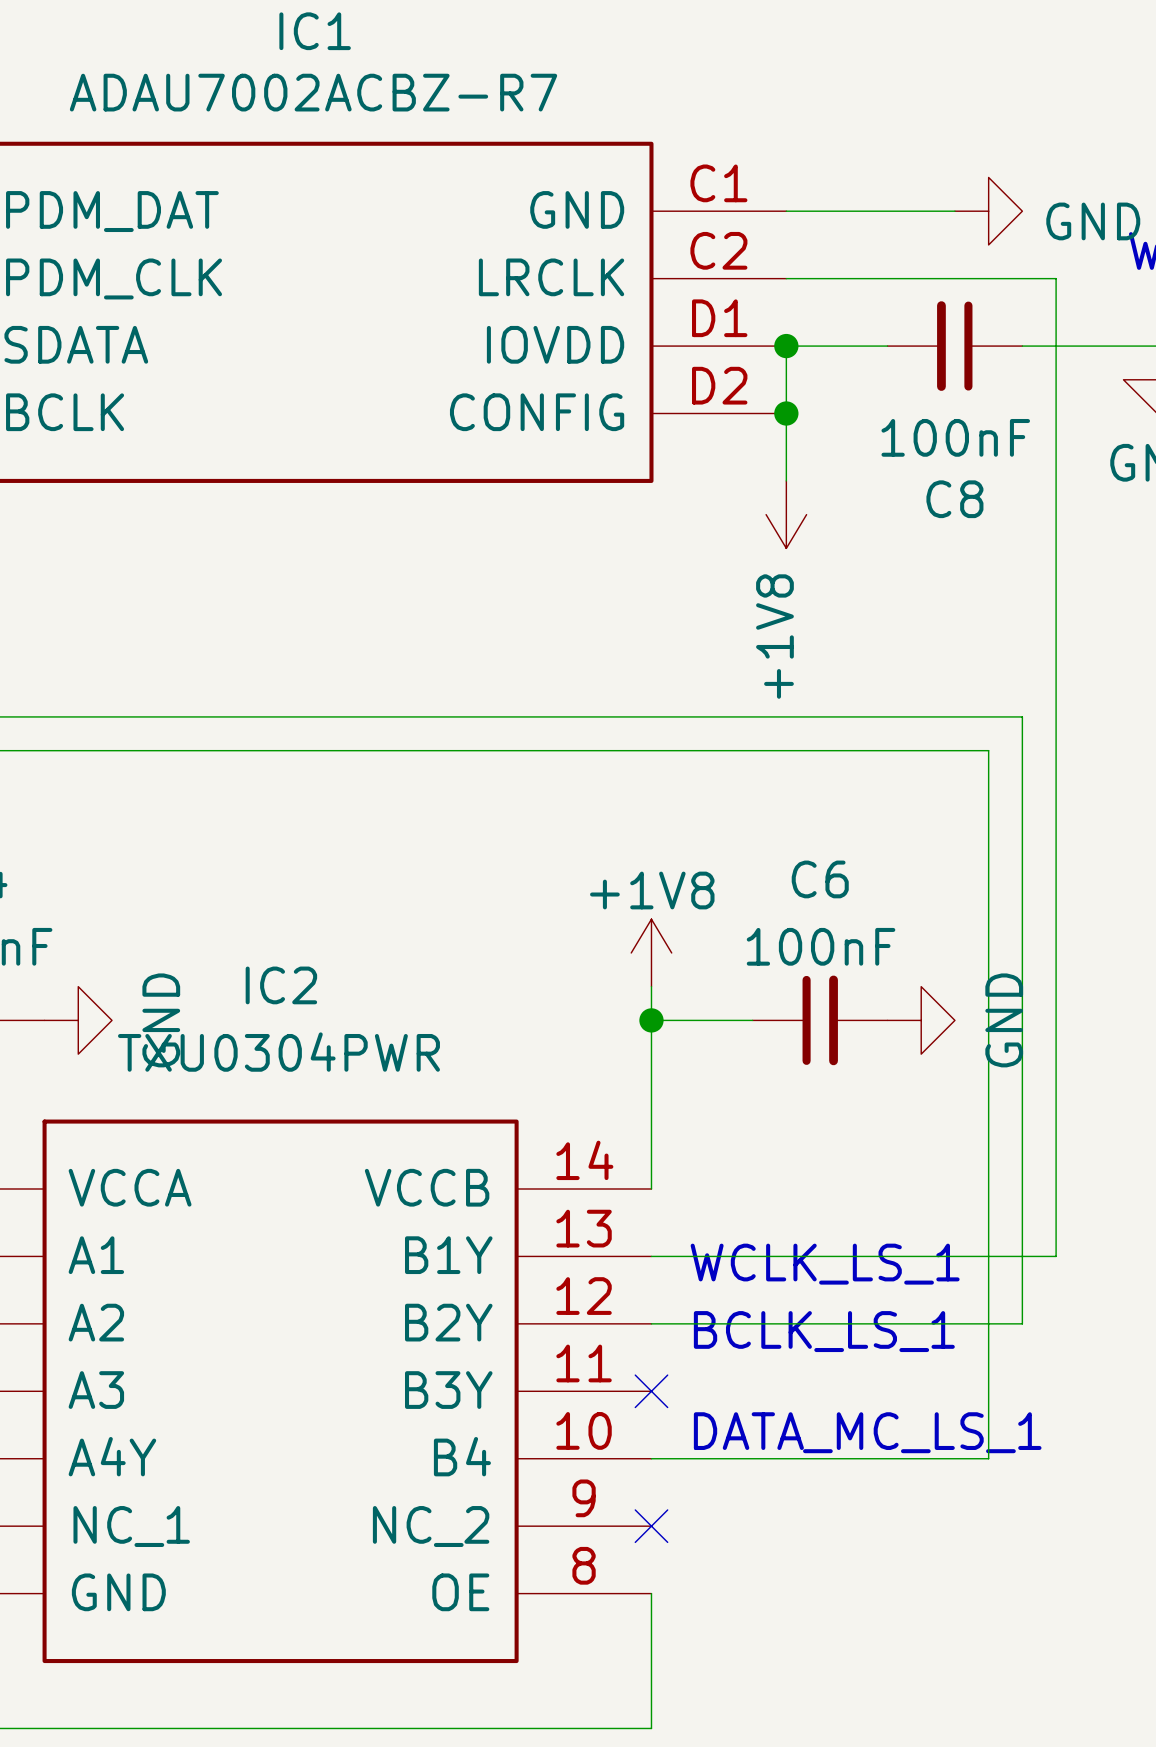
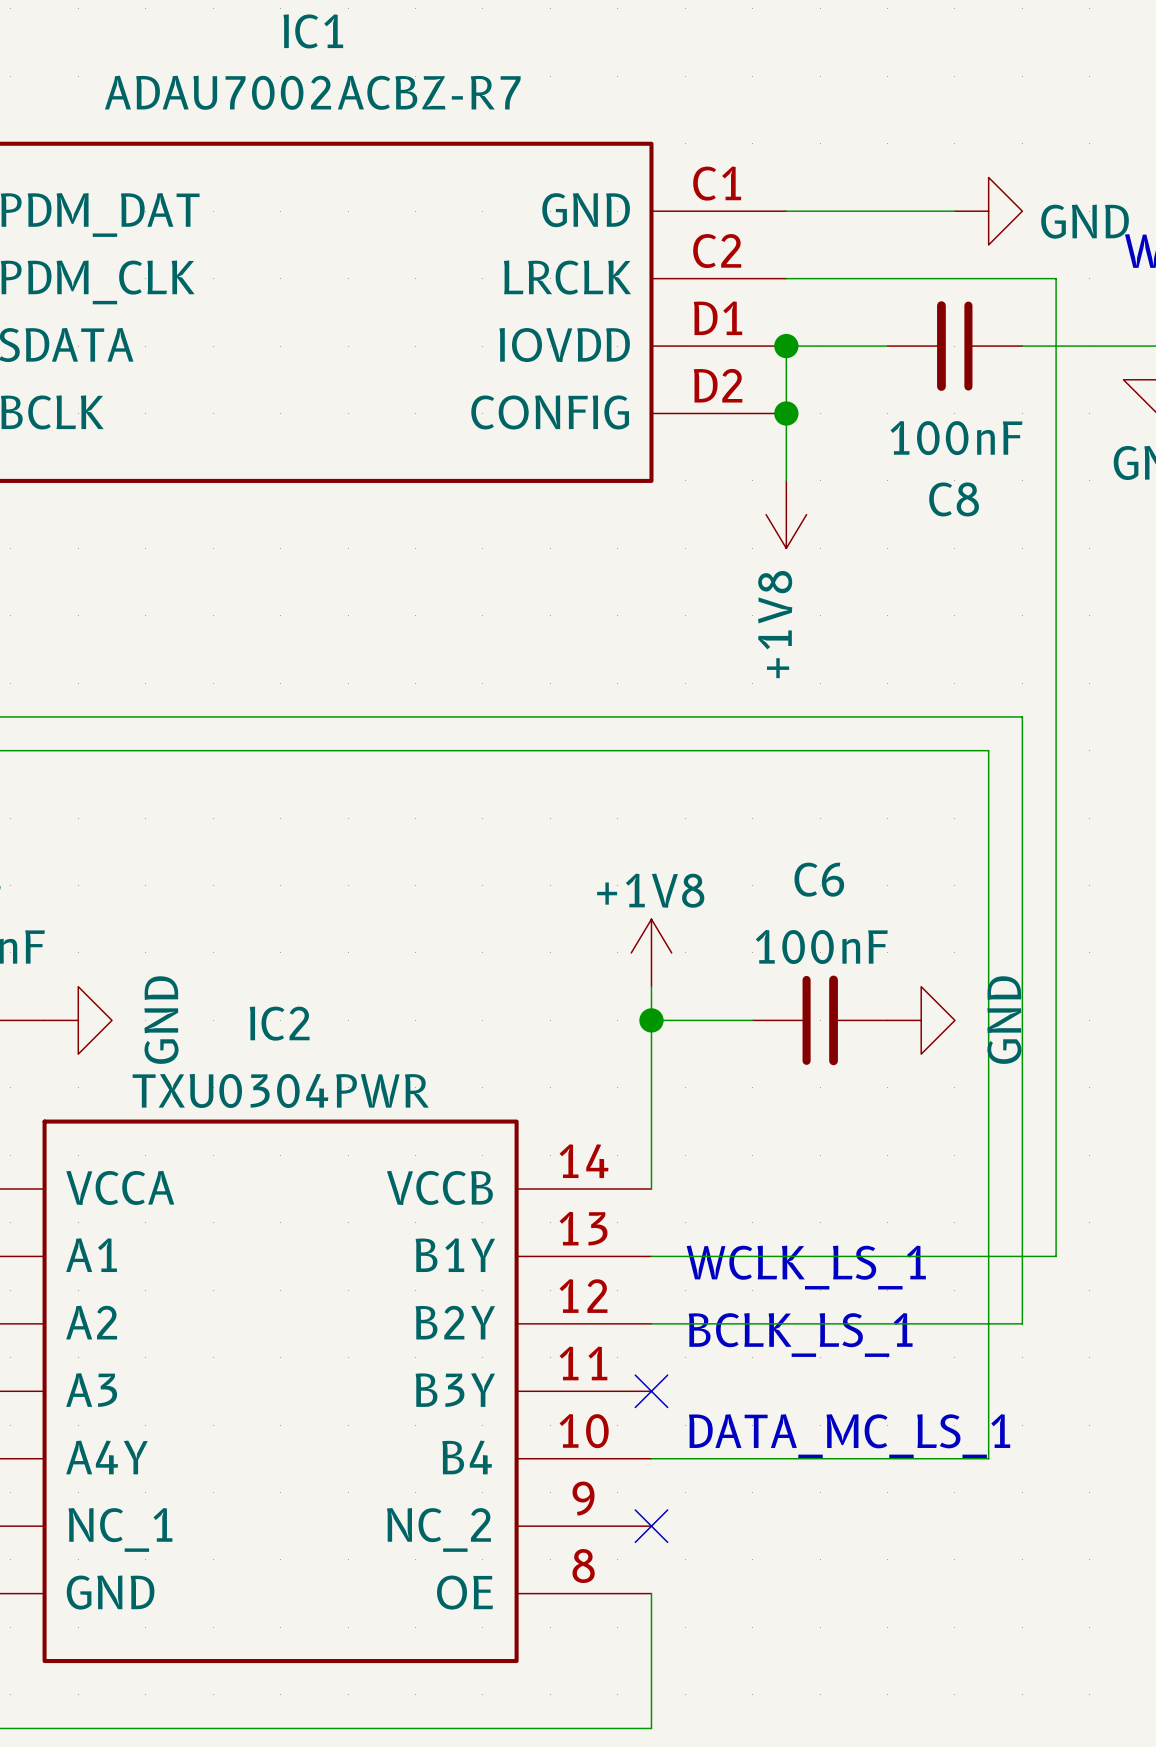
IC2 name position: IC2 (281, 985) -> IC2 (279, 1023)
IC2 value position: TXU0304PWR (278, 1052) -> TXU0304PWR (280, 1090)

